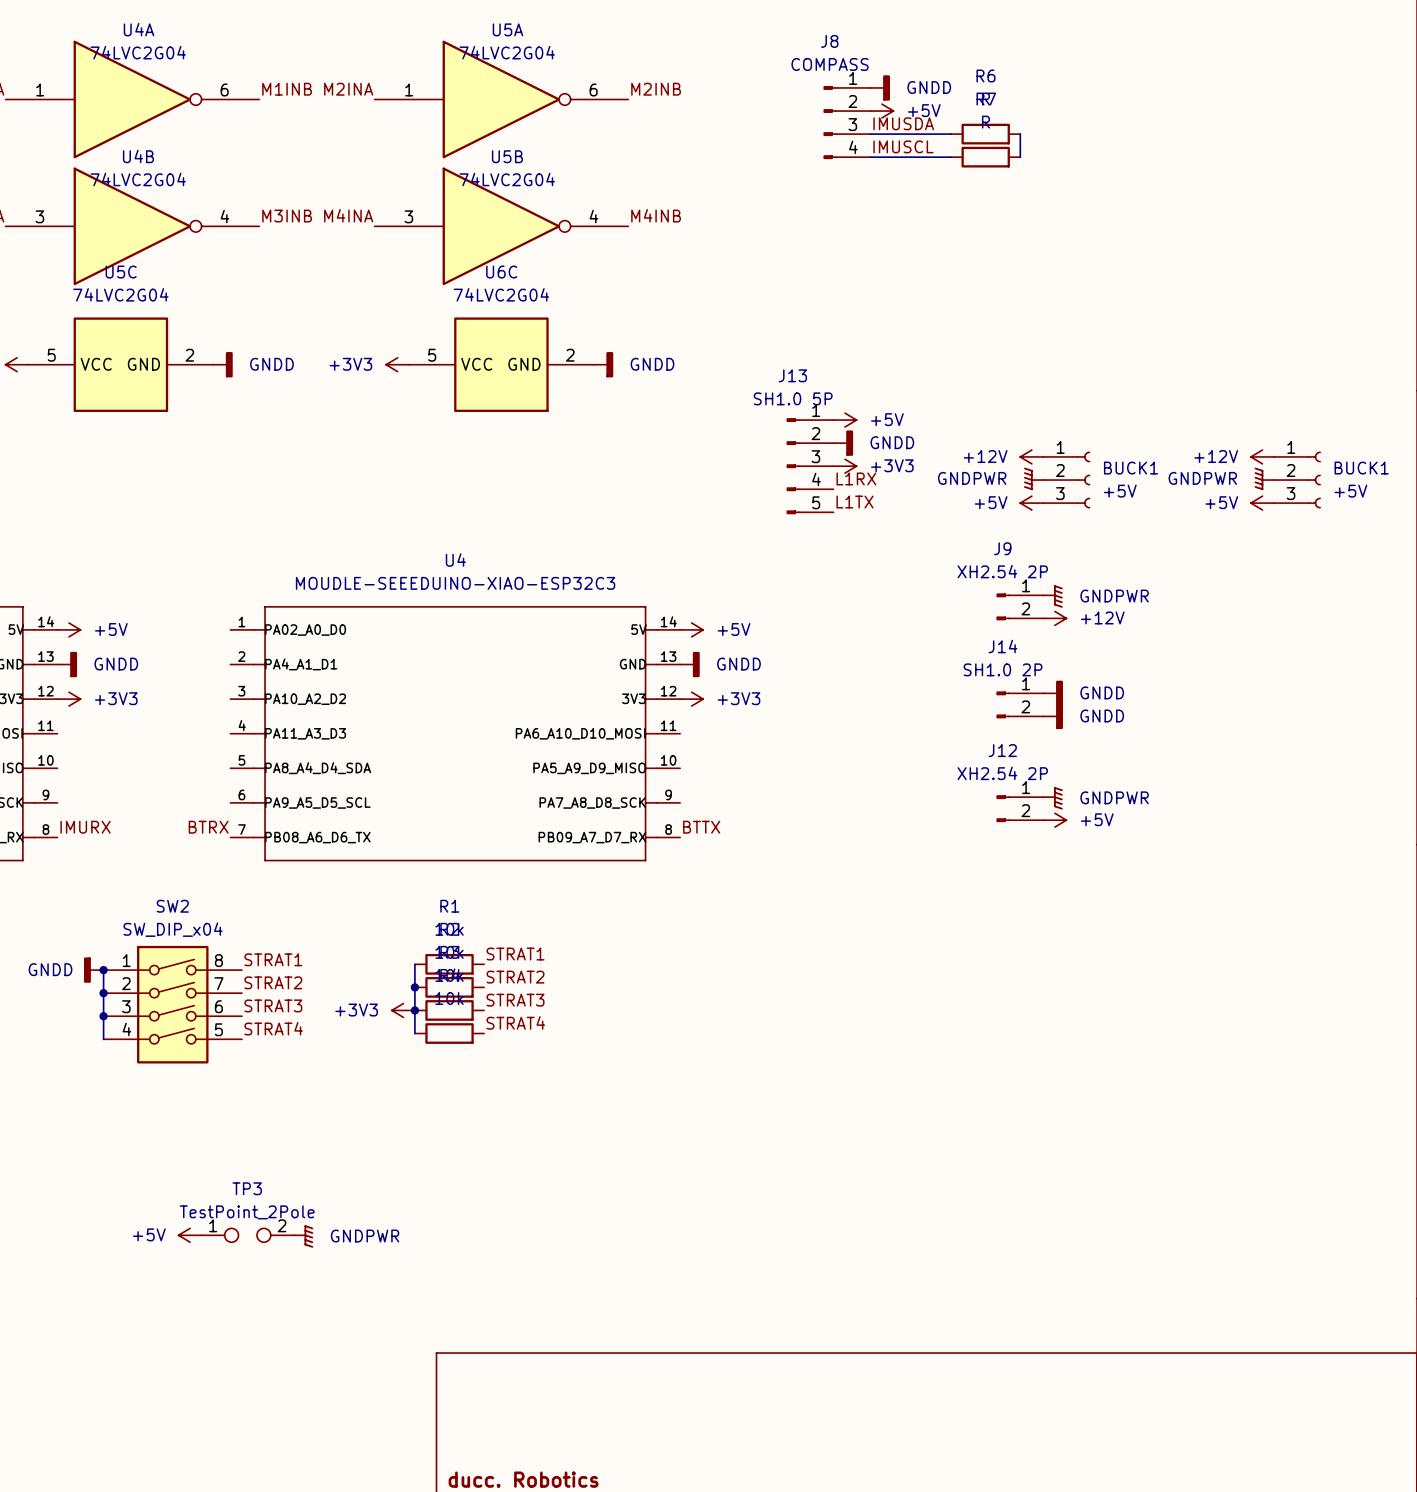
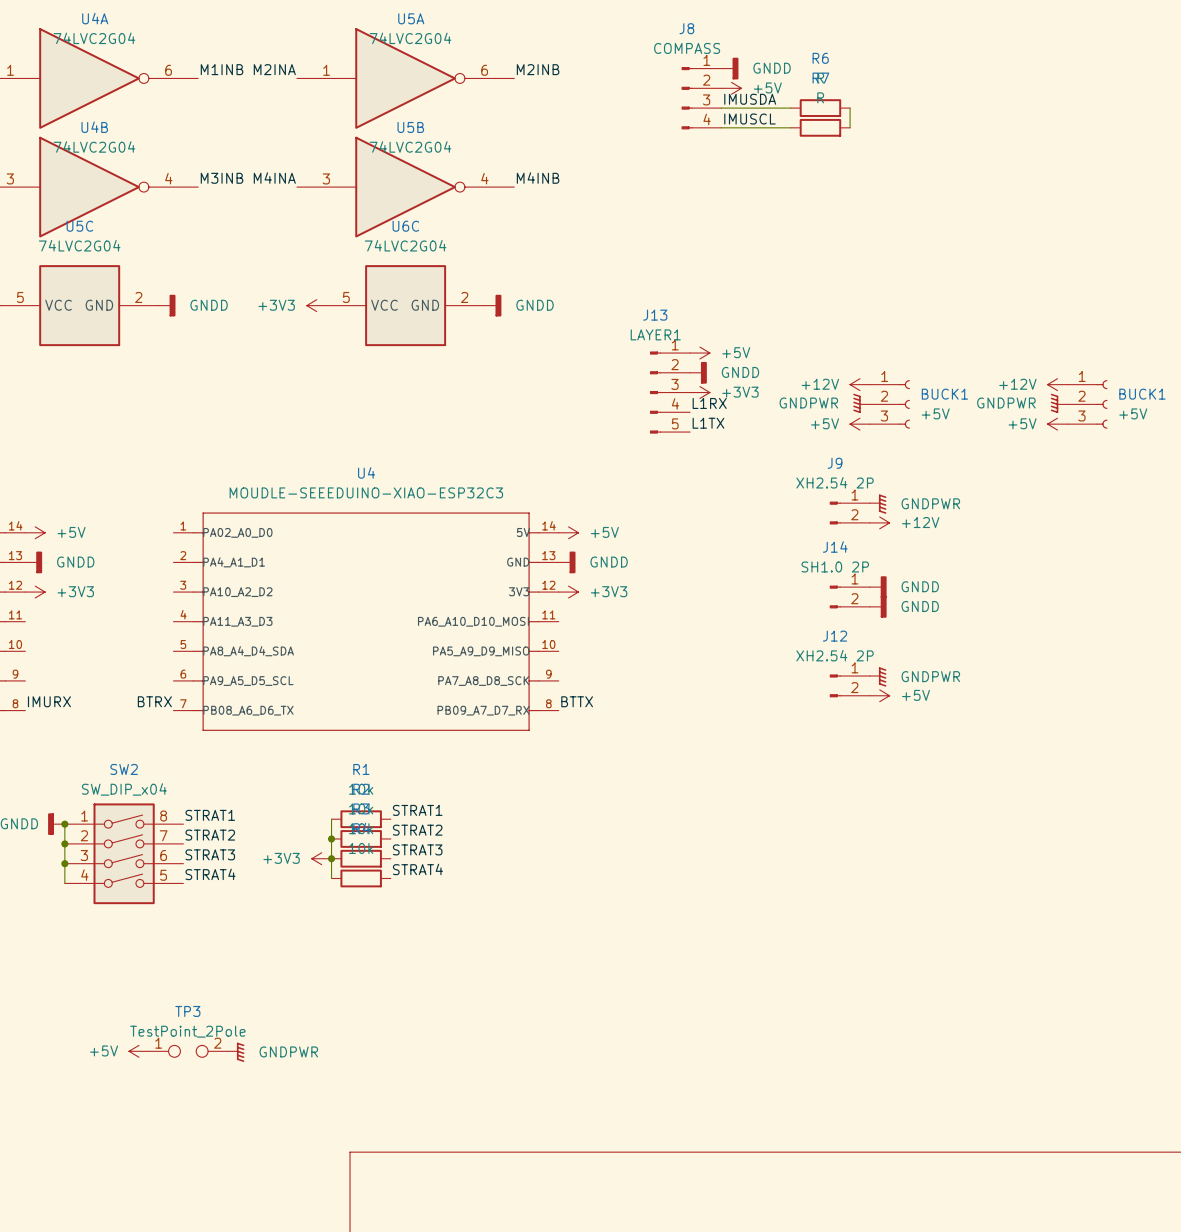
J13 value: SH1.0 5P (793, 398) -> LAYER1 (655, 334)

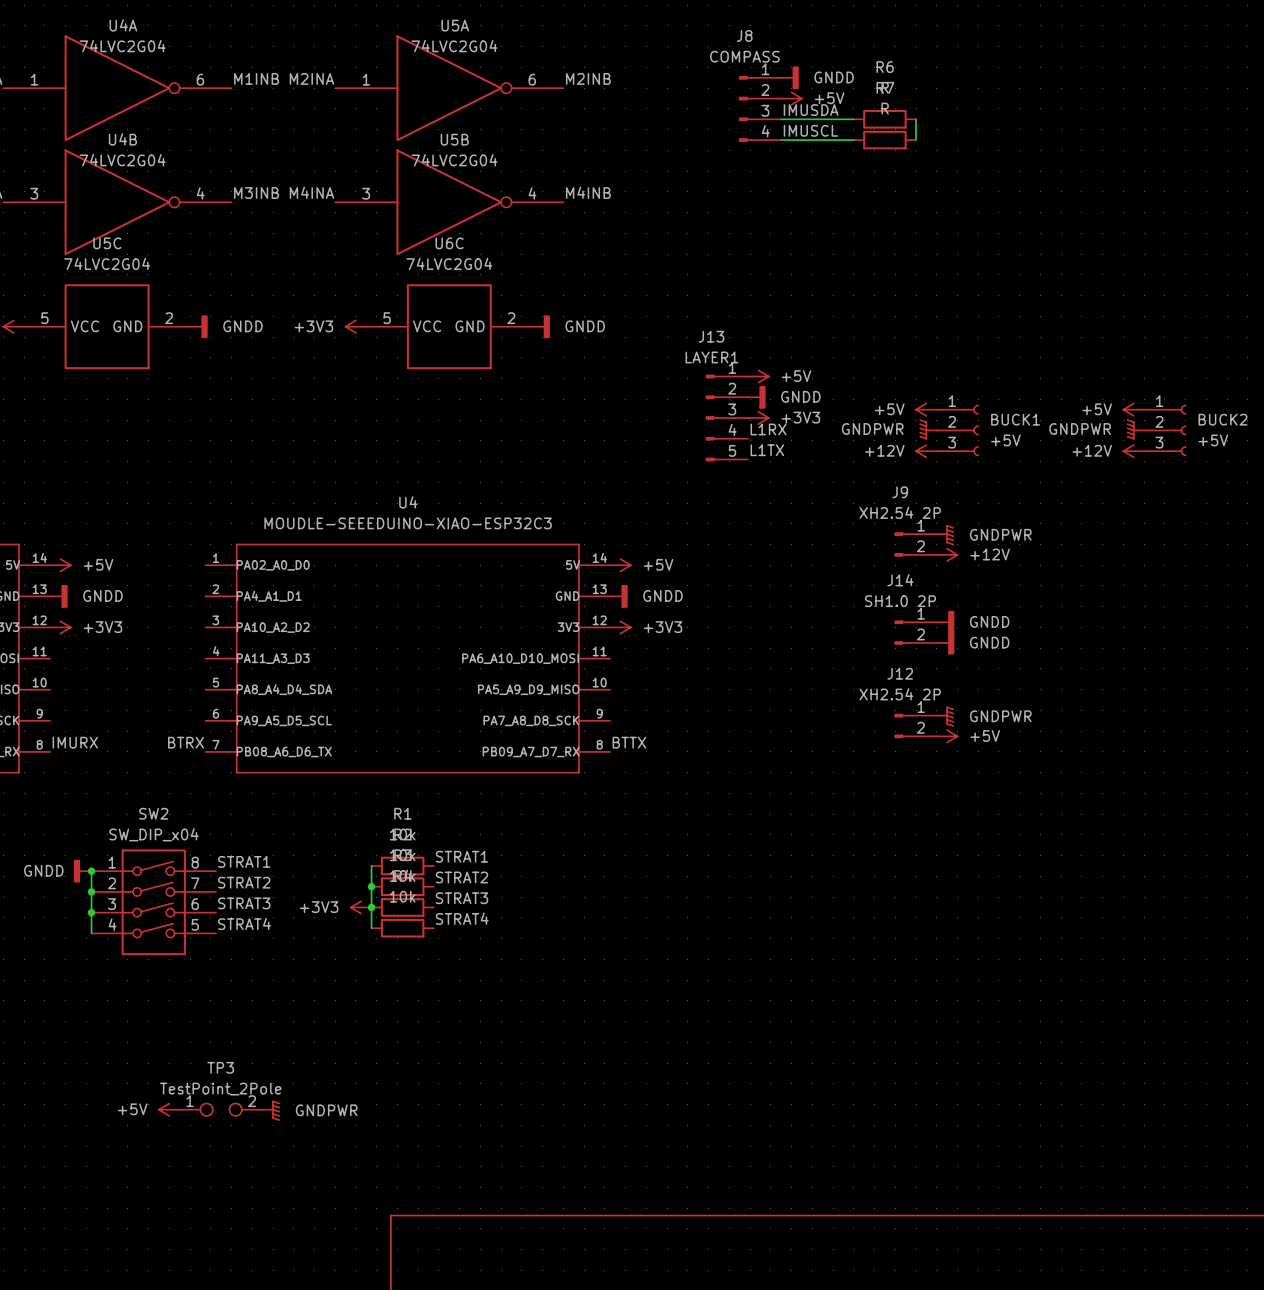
power symbol: +12V (859, 384) -> +5V (926, 409)
power symbol: +12V (1057, 384) -> +5V (1133, 409)
BUCK1 name: BUCK1 (1142, 394) -> BUCK2 (1222, 419)
power symbol: +5V (859, 424) -> +12V (926, 451)
power symbol: +5V (1057, 424) -> +12V (1133, 451)

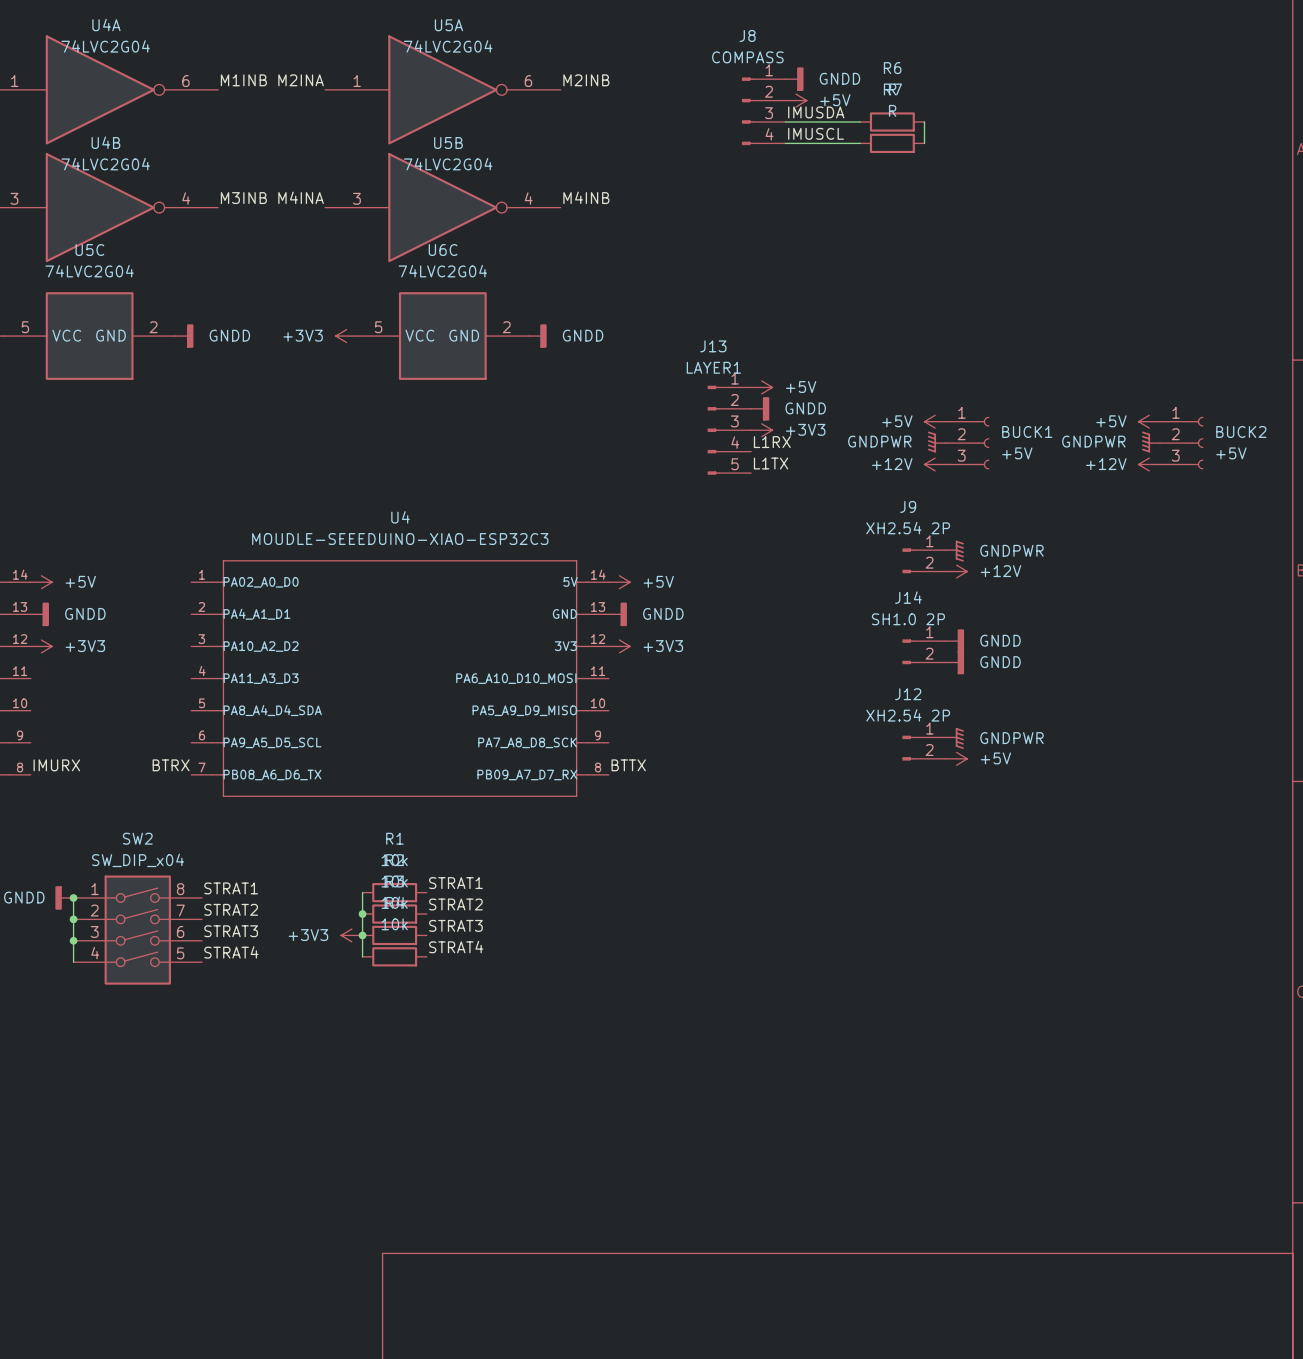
power symbol: +5V (169, 1109) -> none
TP3: TestPoint_2Pole (221, 1109) -> none
power symbol: GNDPWR (271, 1110) -> none

